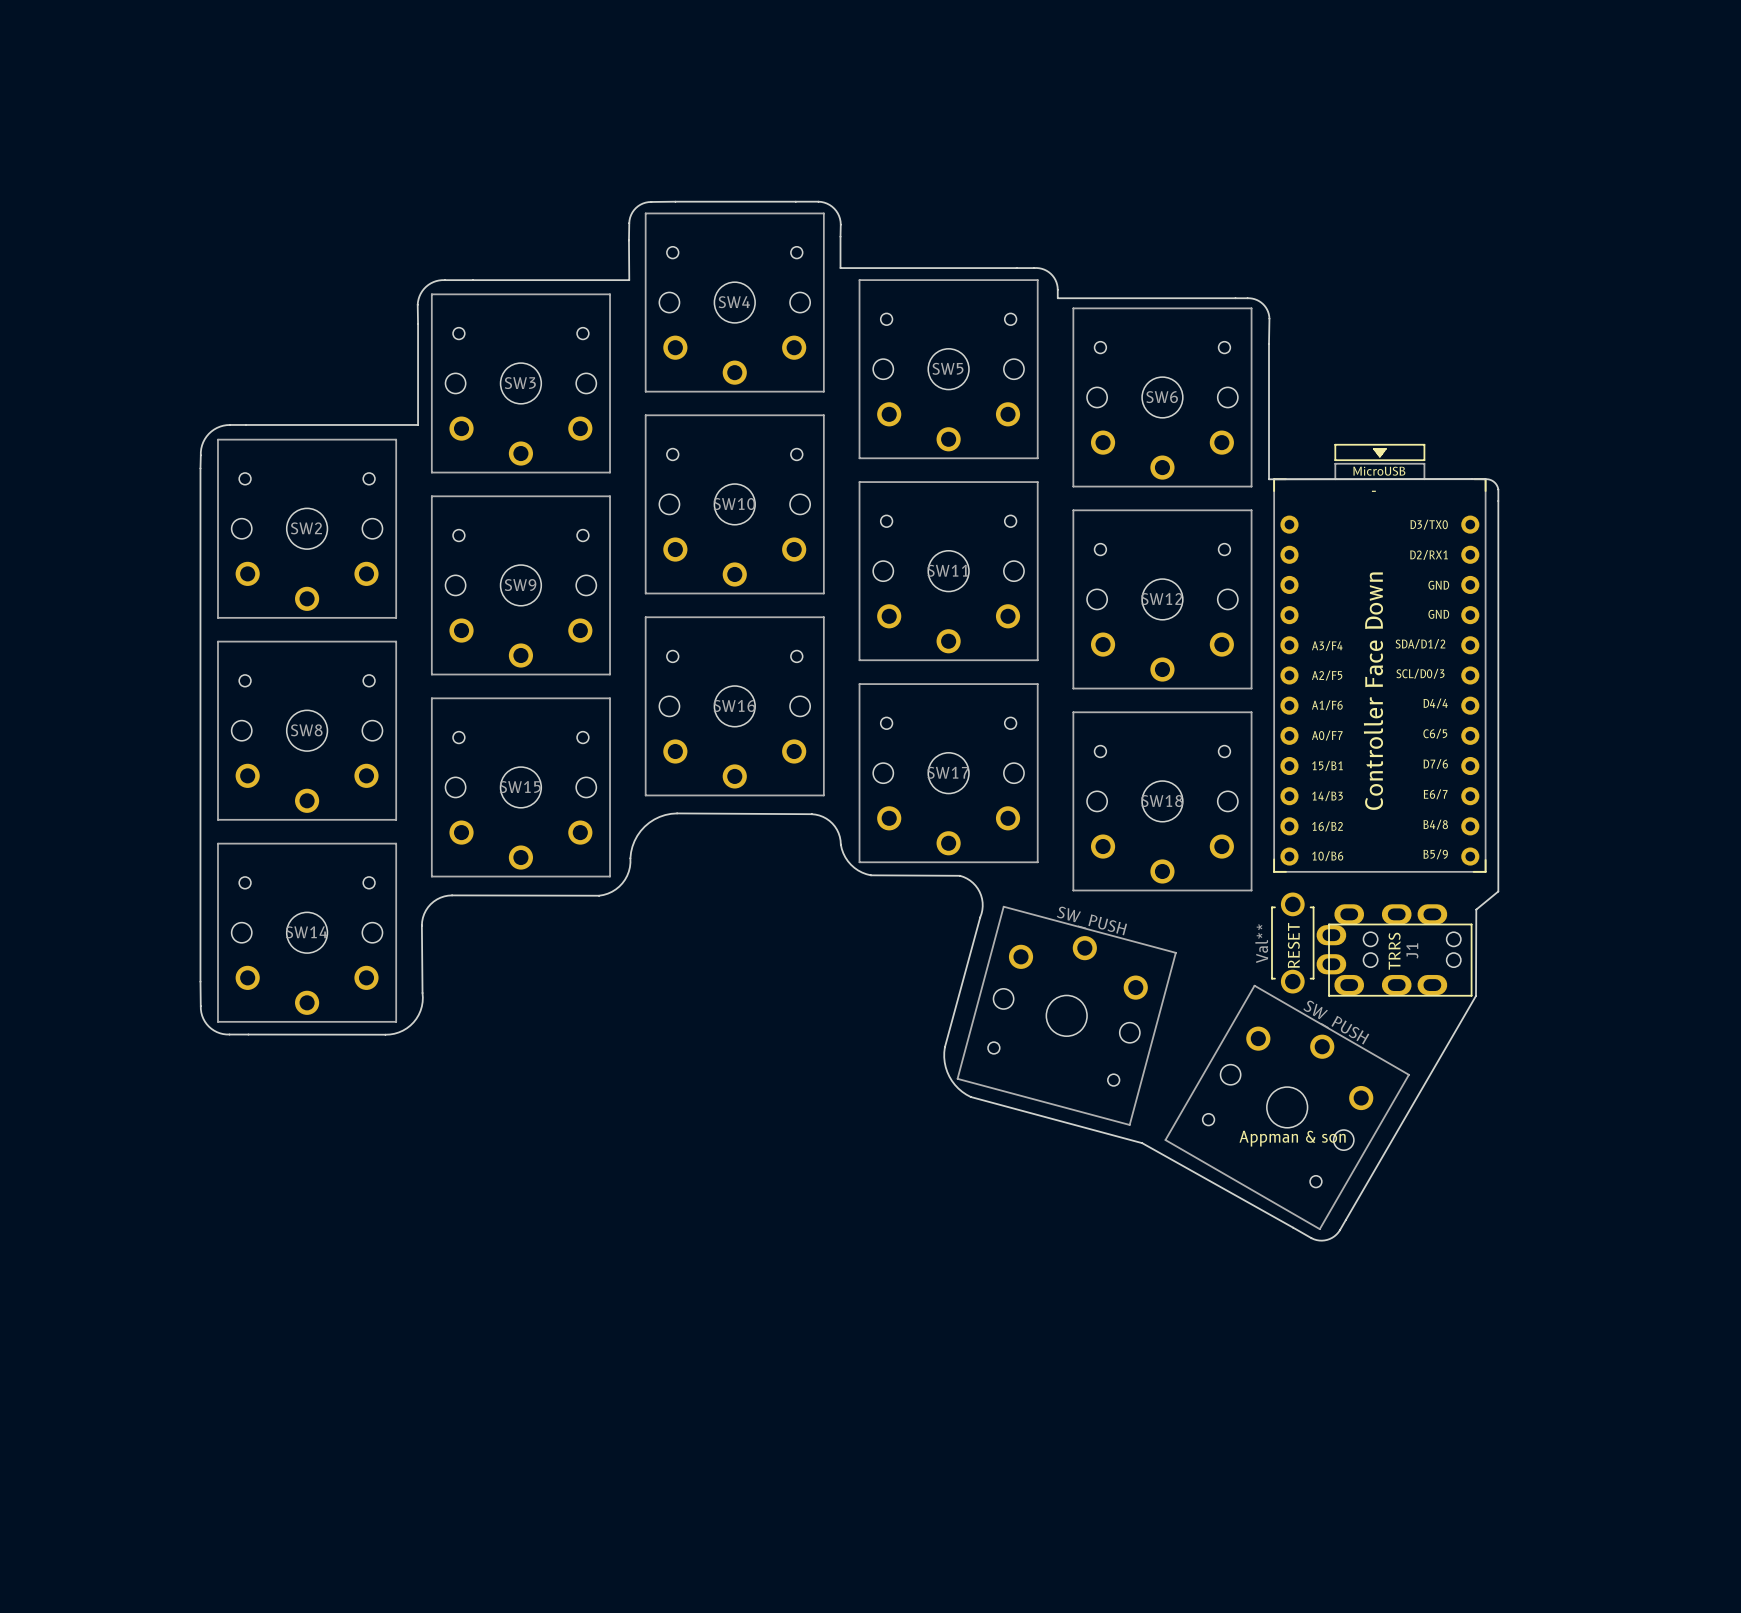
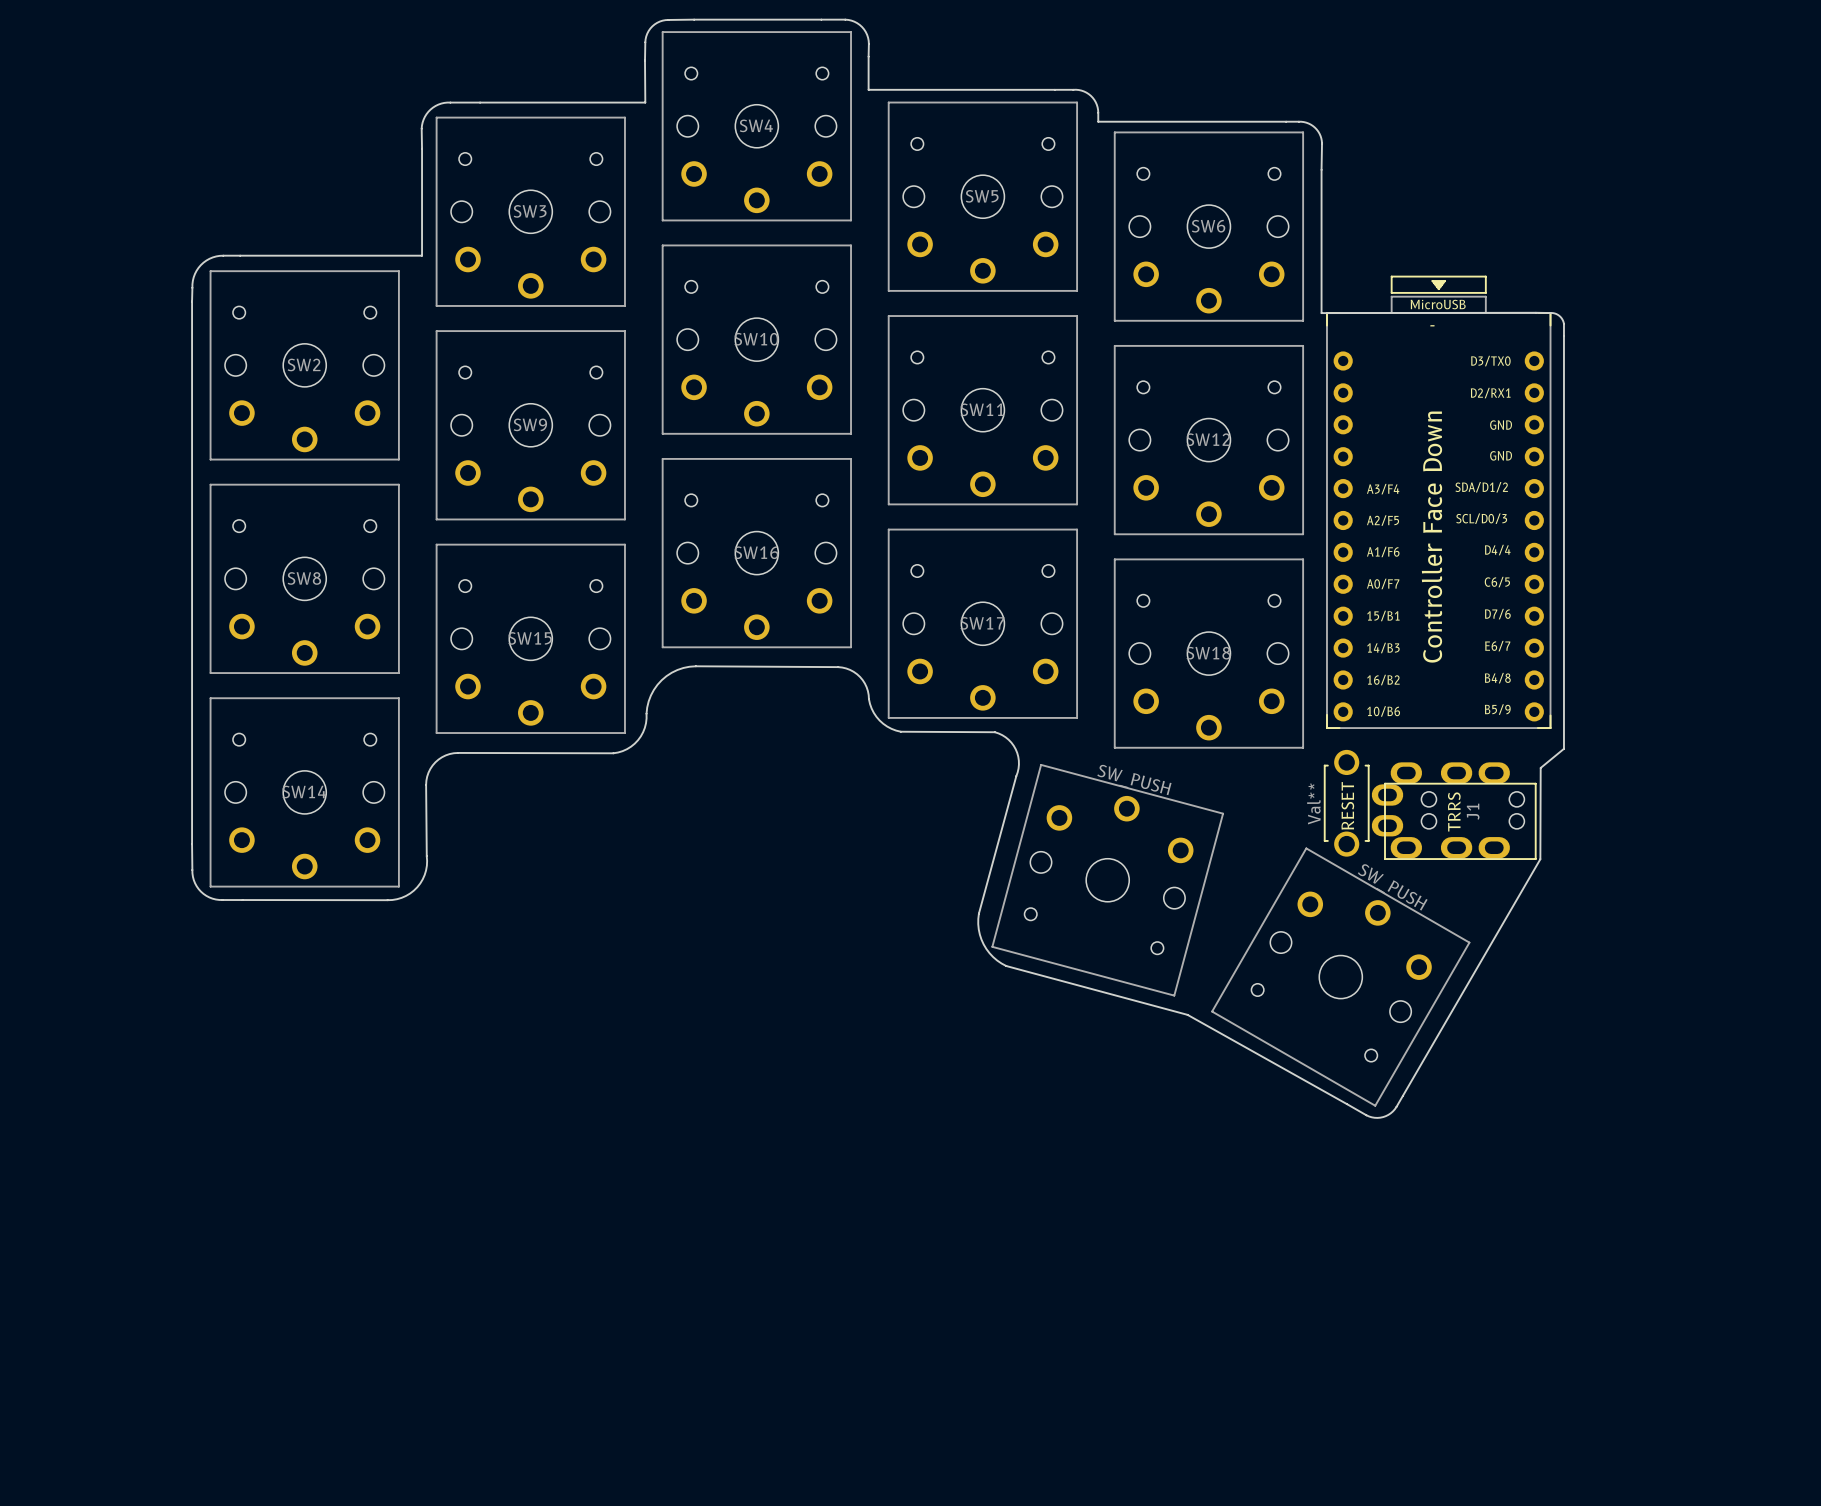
text: Appman & son (1292, 1138) -> none

